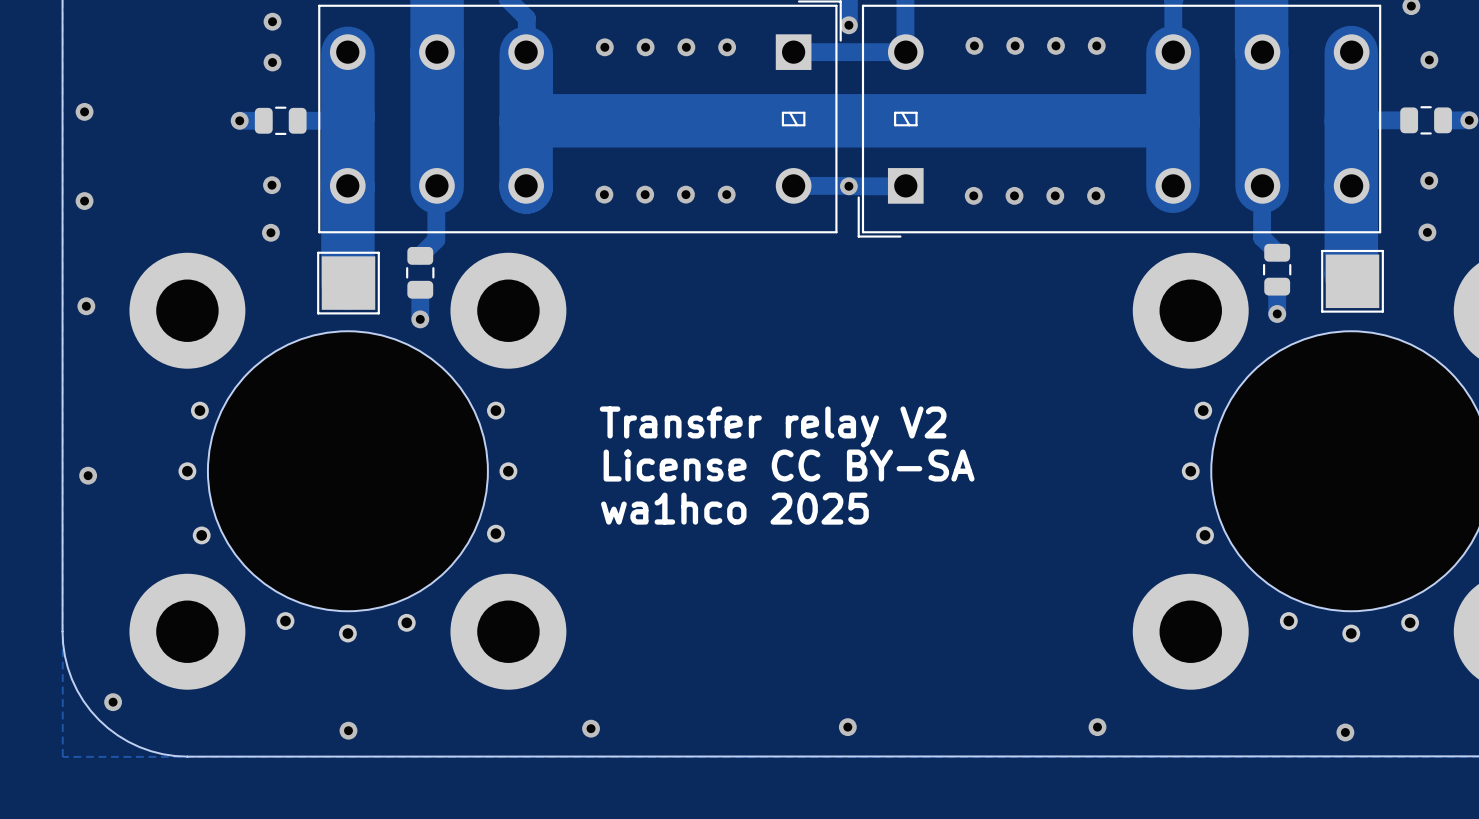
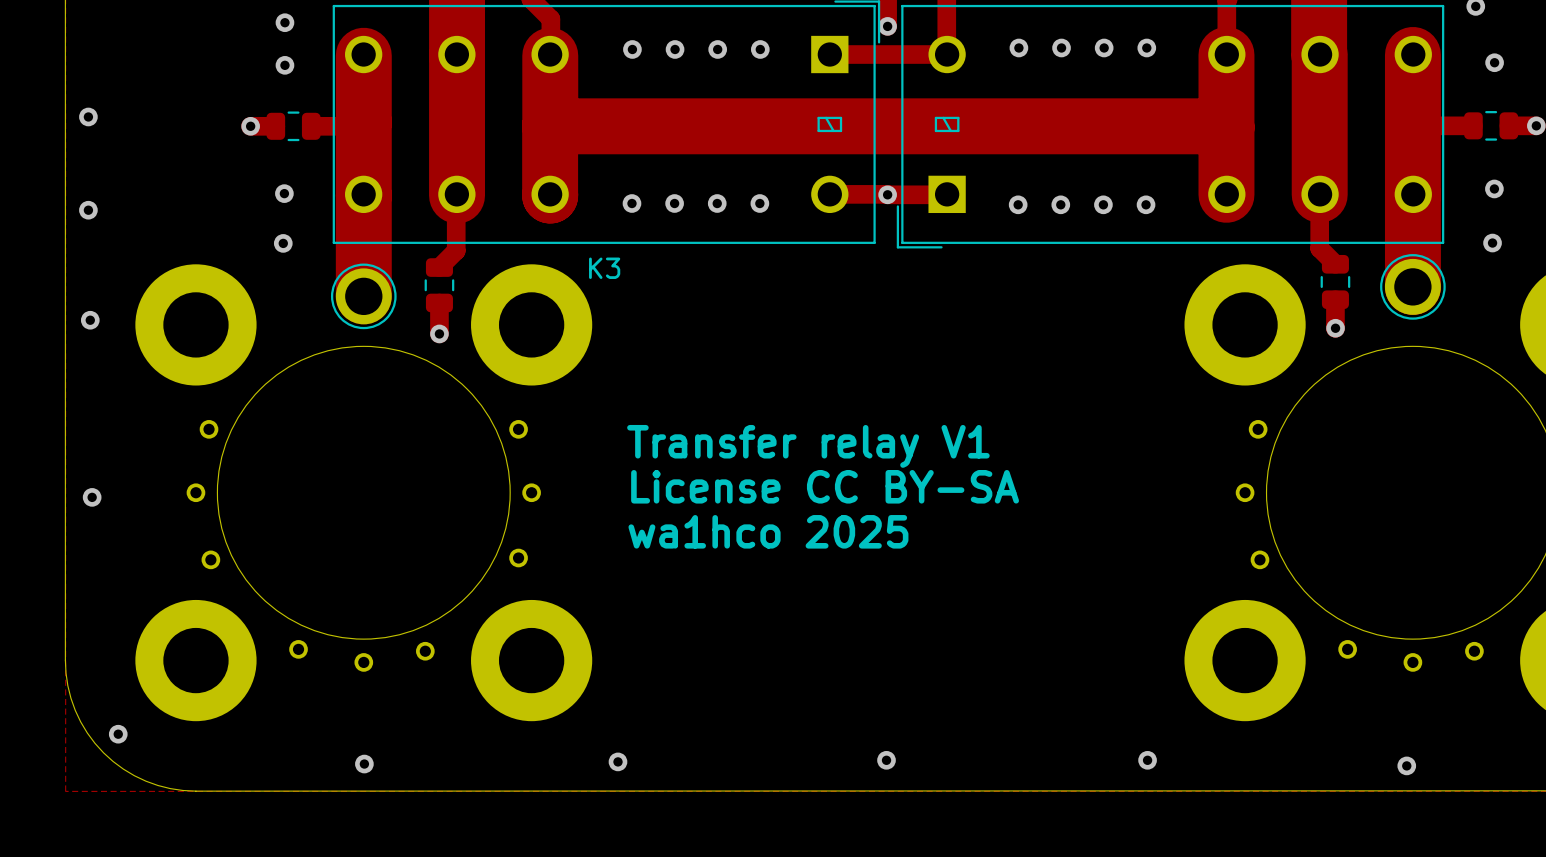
part footprint: [1321, 249, 1384, 313] -> [1380, 254, 1446, 320]
part footprint: [317, 251, 380, 315] -> [330, 263, 397, 330]
K3 name: none -> K3 (604, 268)
text: Transfer relay V2 (773, 426) -> Transfer relay V1 (808, 446)

